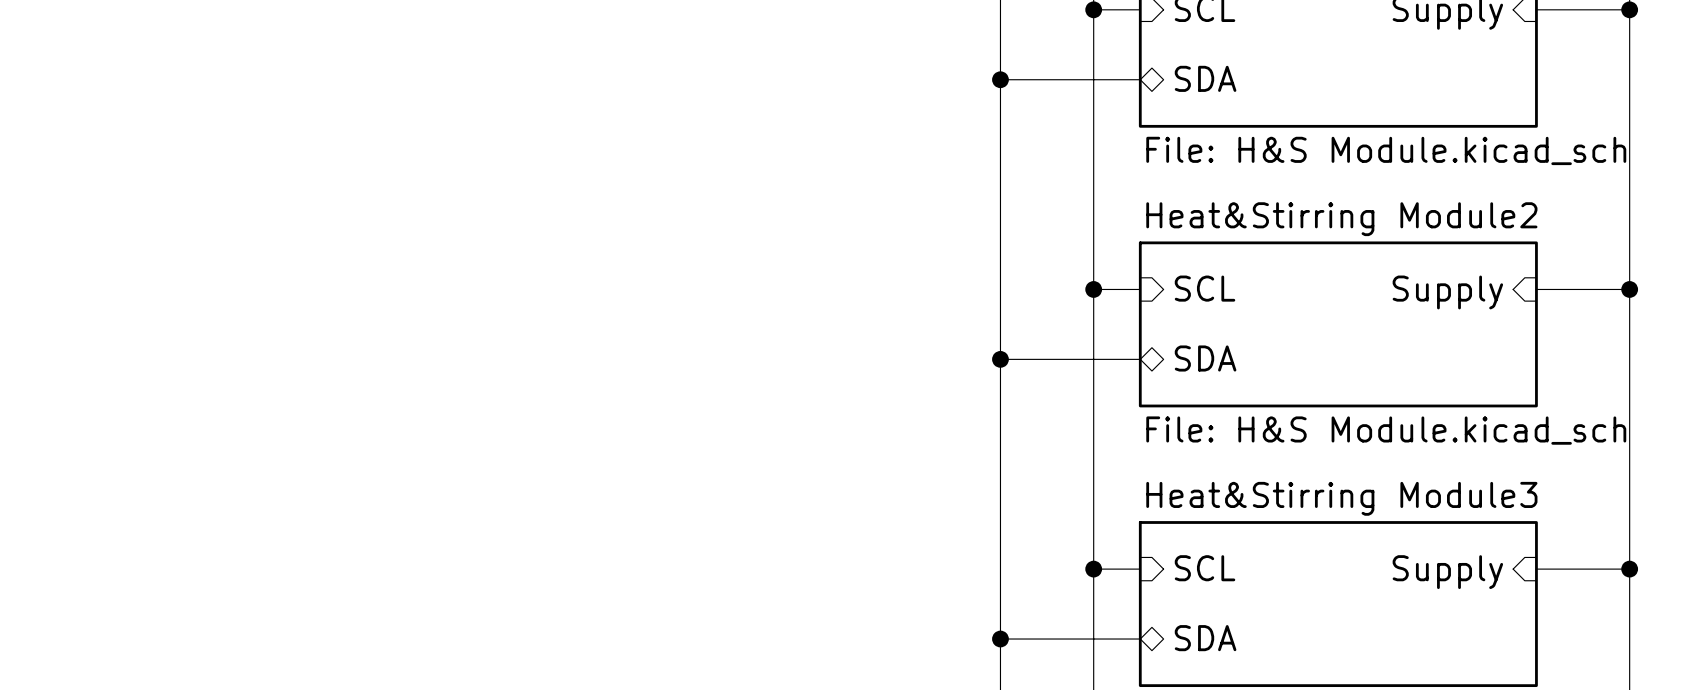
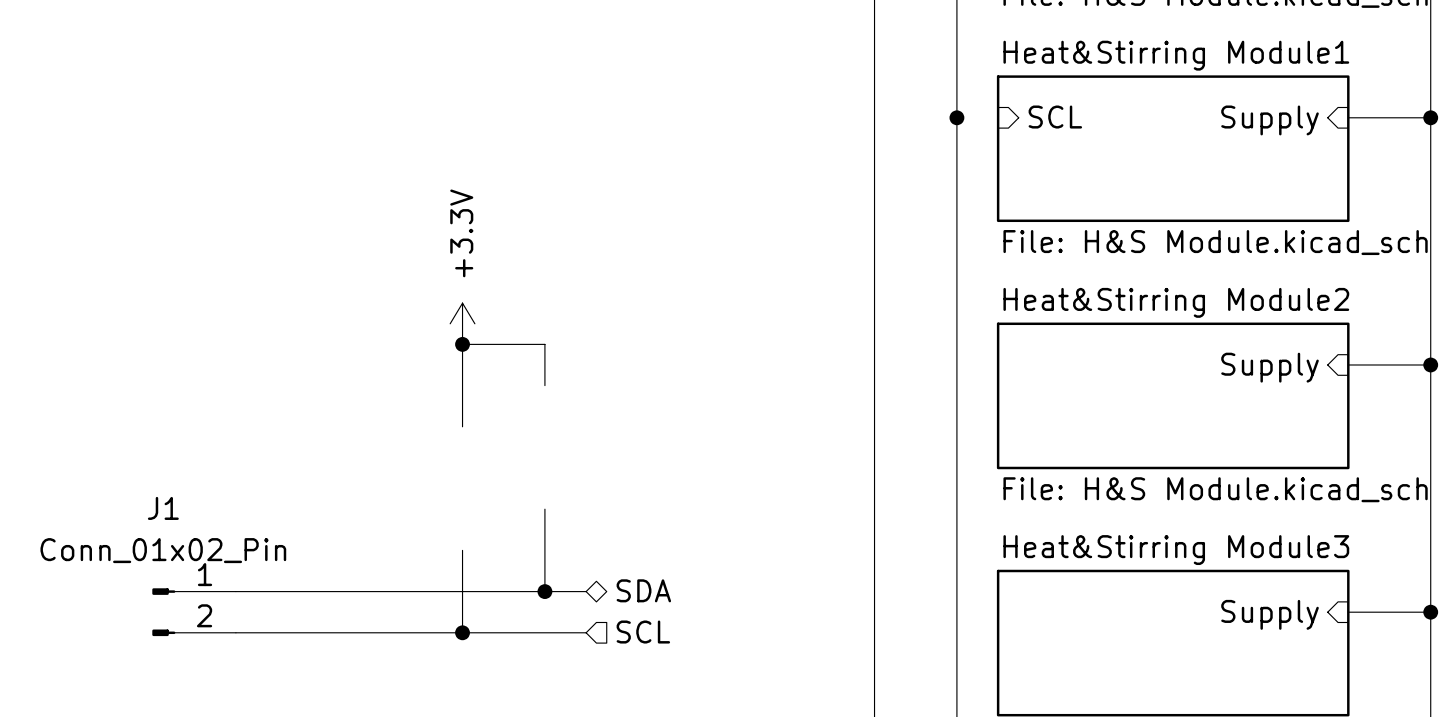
wire: (1093, 9) (1140, 9) -> none
sheet pin: SDA (1205, 78) -> none
wire: (1000, 79) (1140, 79) -> none
junction: (1000, 79) -> none
power symbol: none -> +3.3V (462, 323)
junction: none -> (462, 344)
sheet pin: SCL (1205, 288) -> none
wire: (1093, 289) (1140, 289) -> none
junction: (1093, 289) -> none
wire: none -> (544, 385) (544, 344) (462, 344) (462, 426)
sheet pin: SDA (1205, 358) -> none
wire: (1000, 359) (1140, 359) -> none
junction: (1000, 359) -> none
wire: none -> (544, 509) (544, 591)
wire: none -> (462, 550) (462, 632)
hierarchical label: none -> SDA (643, 590)
wire: none -> (235, 591) (586, 591)
junction: none -> (544, 591)
sheet pin: SCL (1205, 568) -> none
J1: none -> Conn_01x02_Pin (194, 612)
wire: (1093, 569) (1140, 569) -> none
junction: (1093, 569) -> none
hierarchical label: none -> SCL (643, 632)
wire: none -> (235, 632) (586, 632)
junction: none -> (462, 632)
sheet pin: SDA (1205, 638) -> none
wire: (1000, 639) (1140, 639) -> none
junction: (1000, 639) -> none

